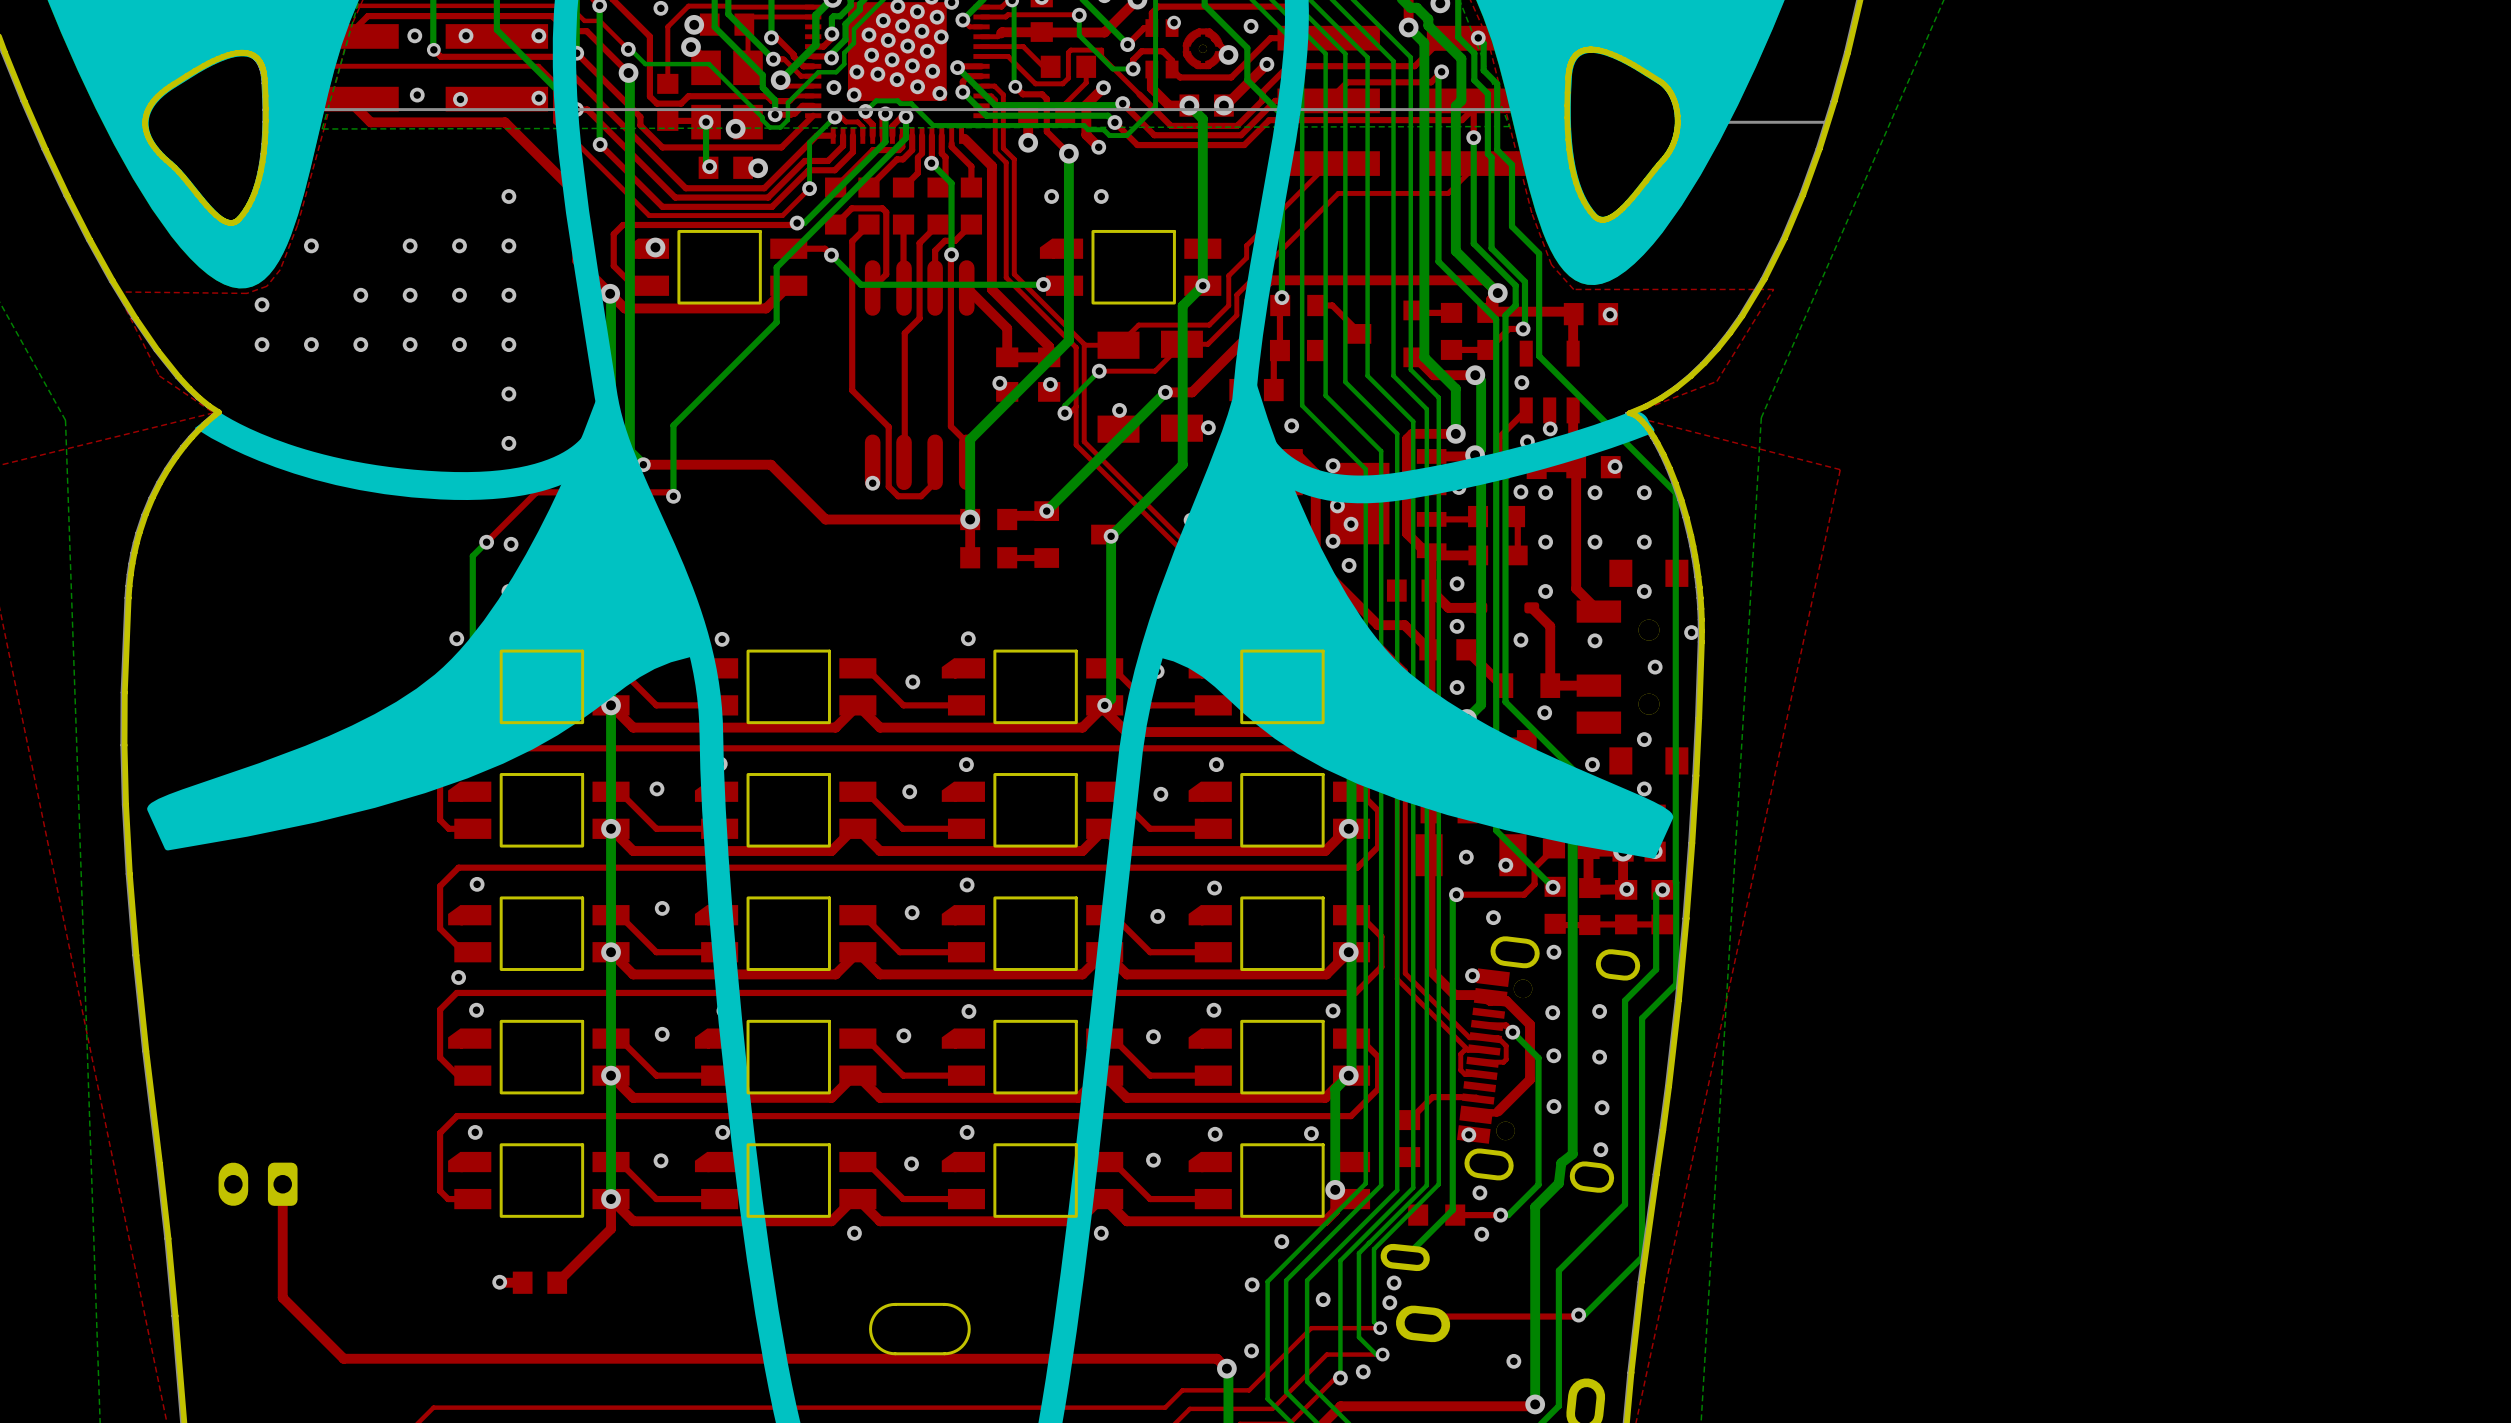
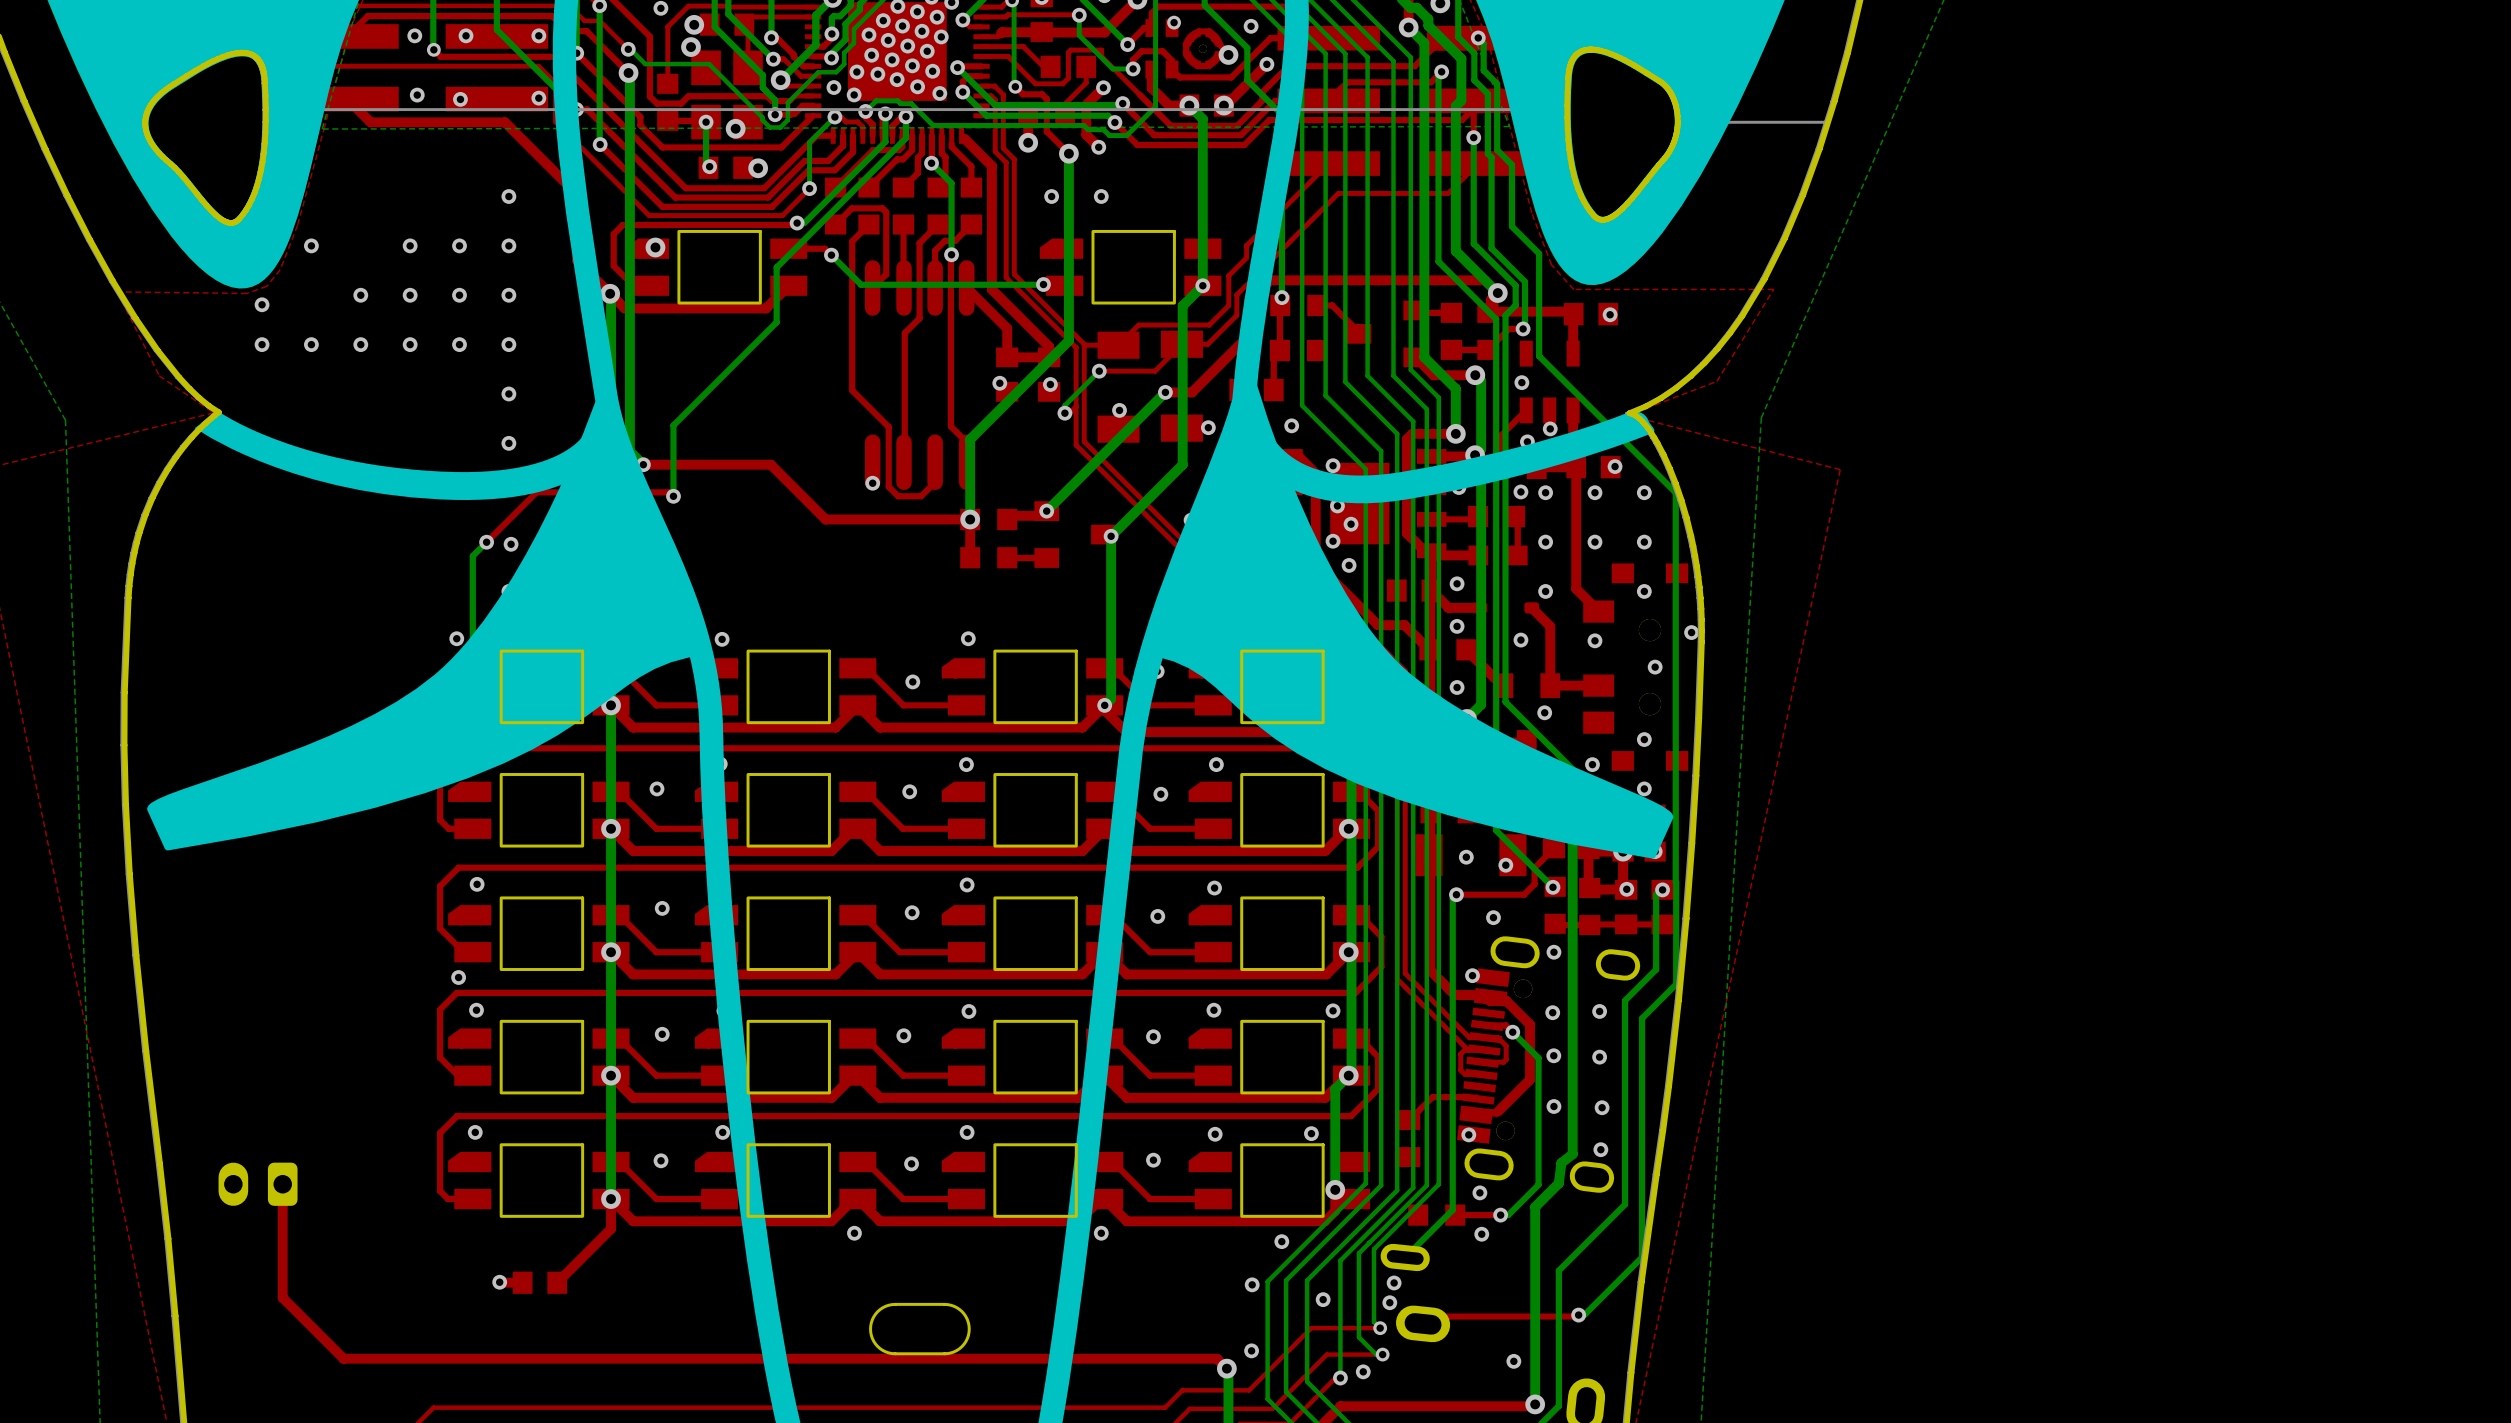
part footprint: [1576, 559, 1689, 775] -> [1583, 563, 1689, 771]

